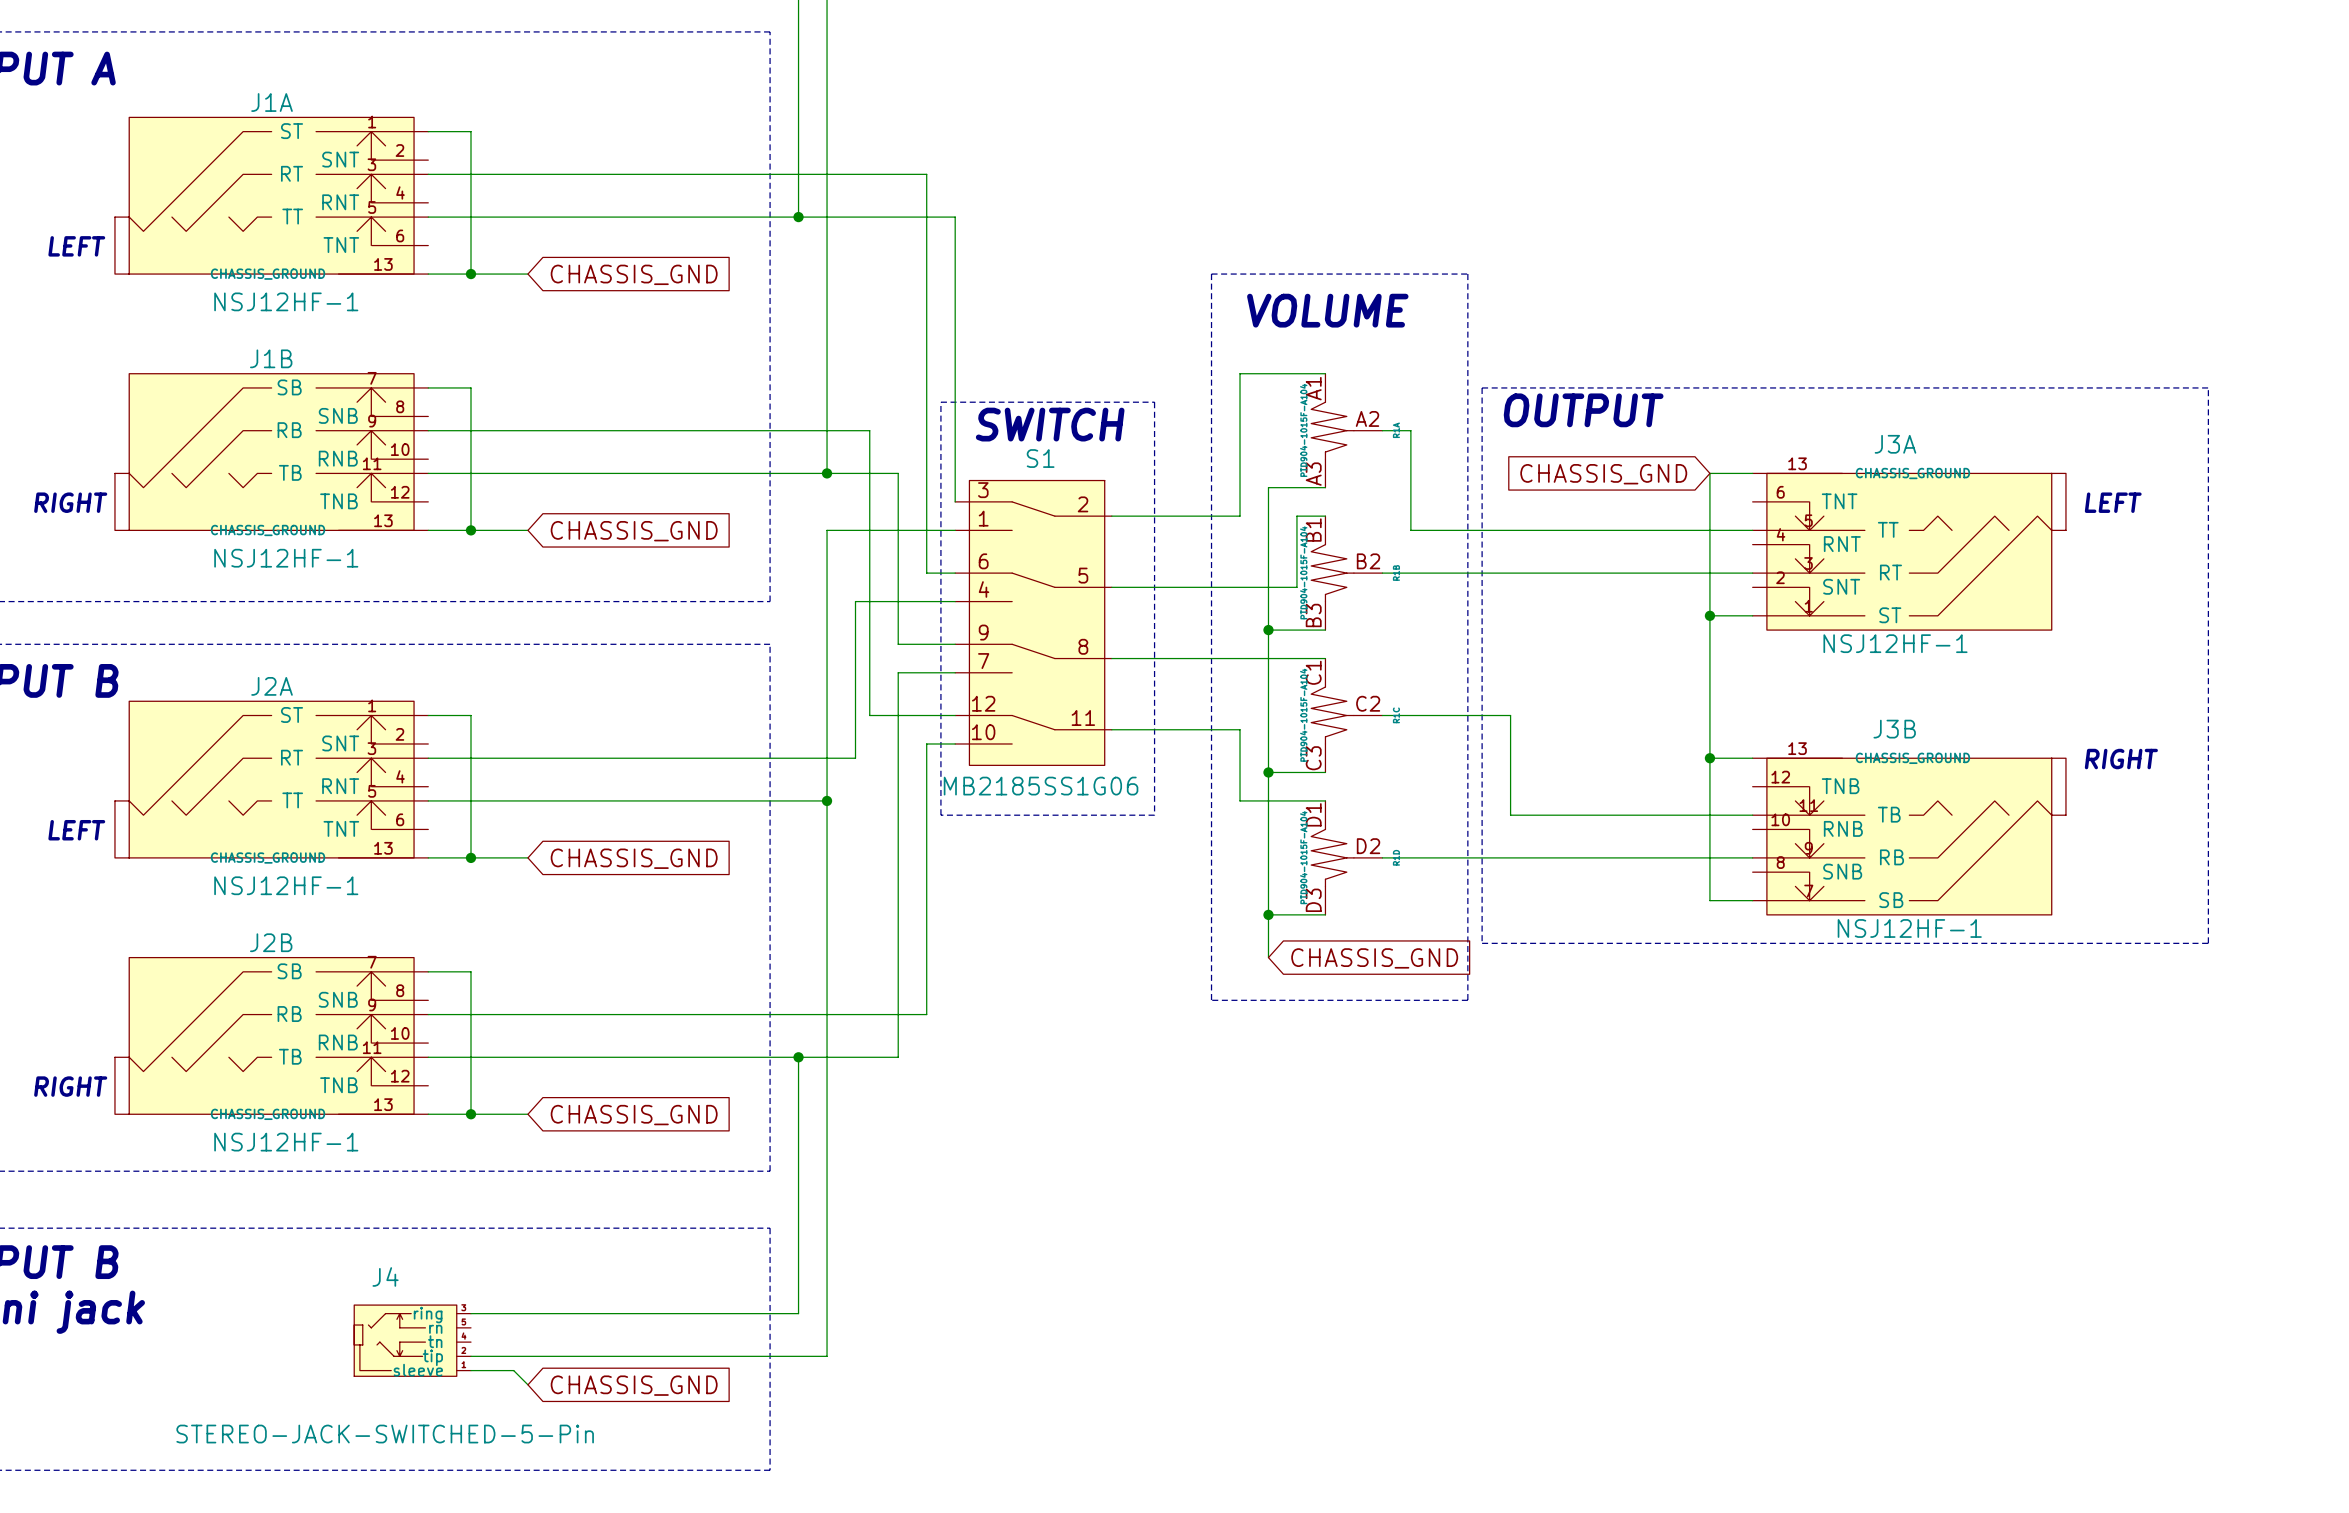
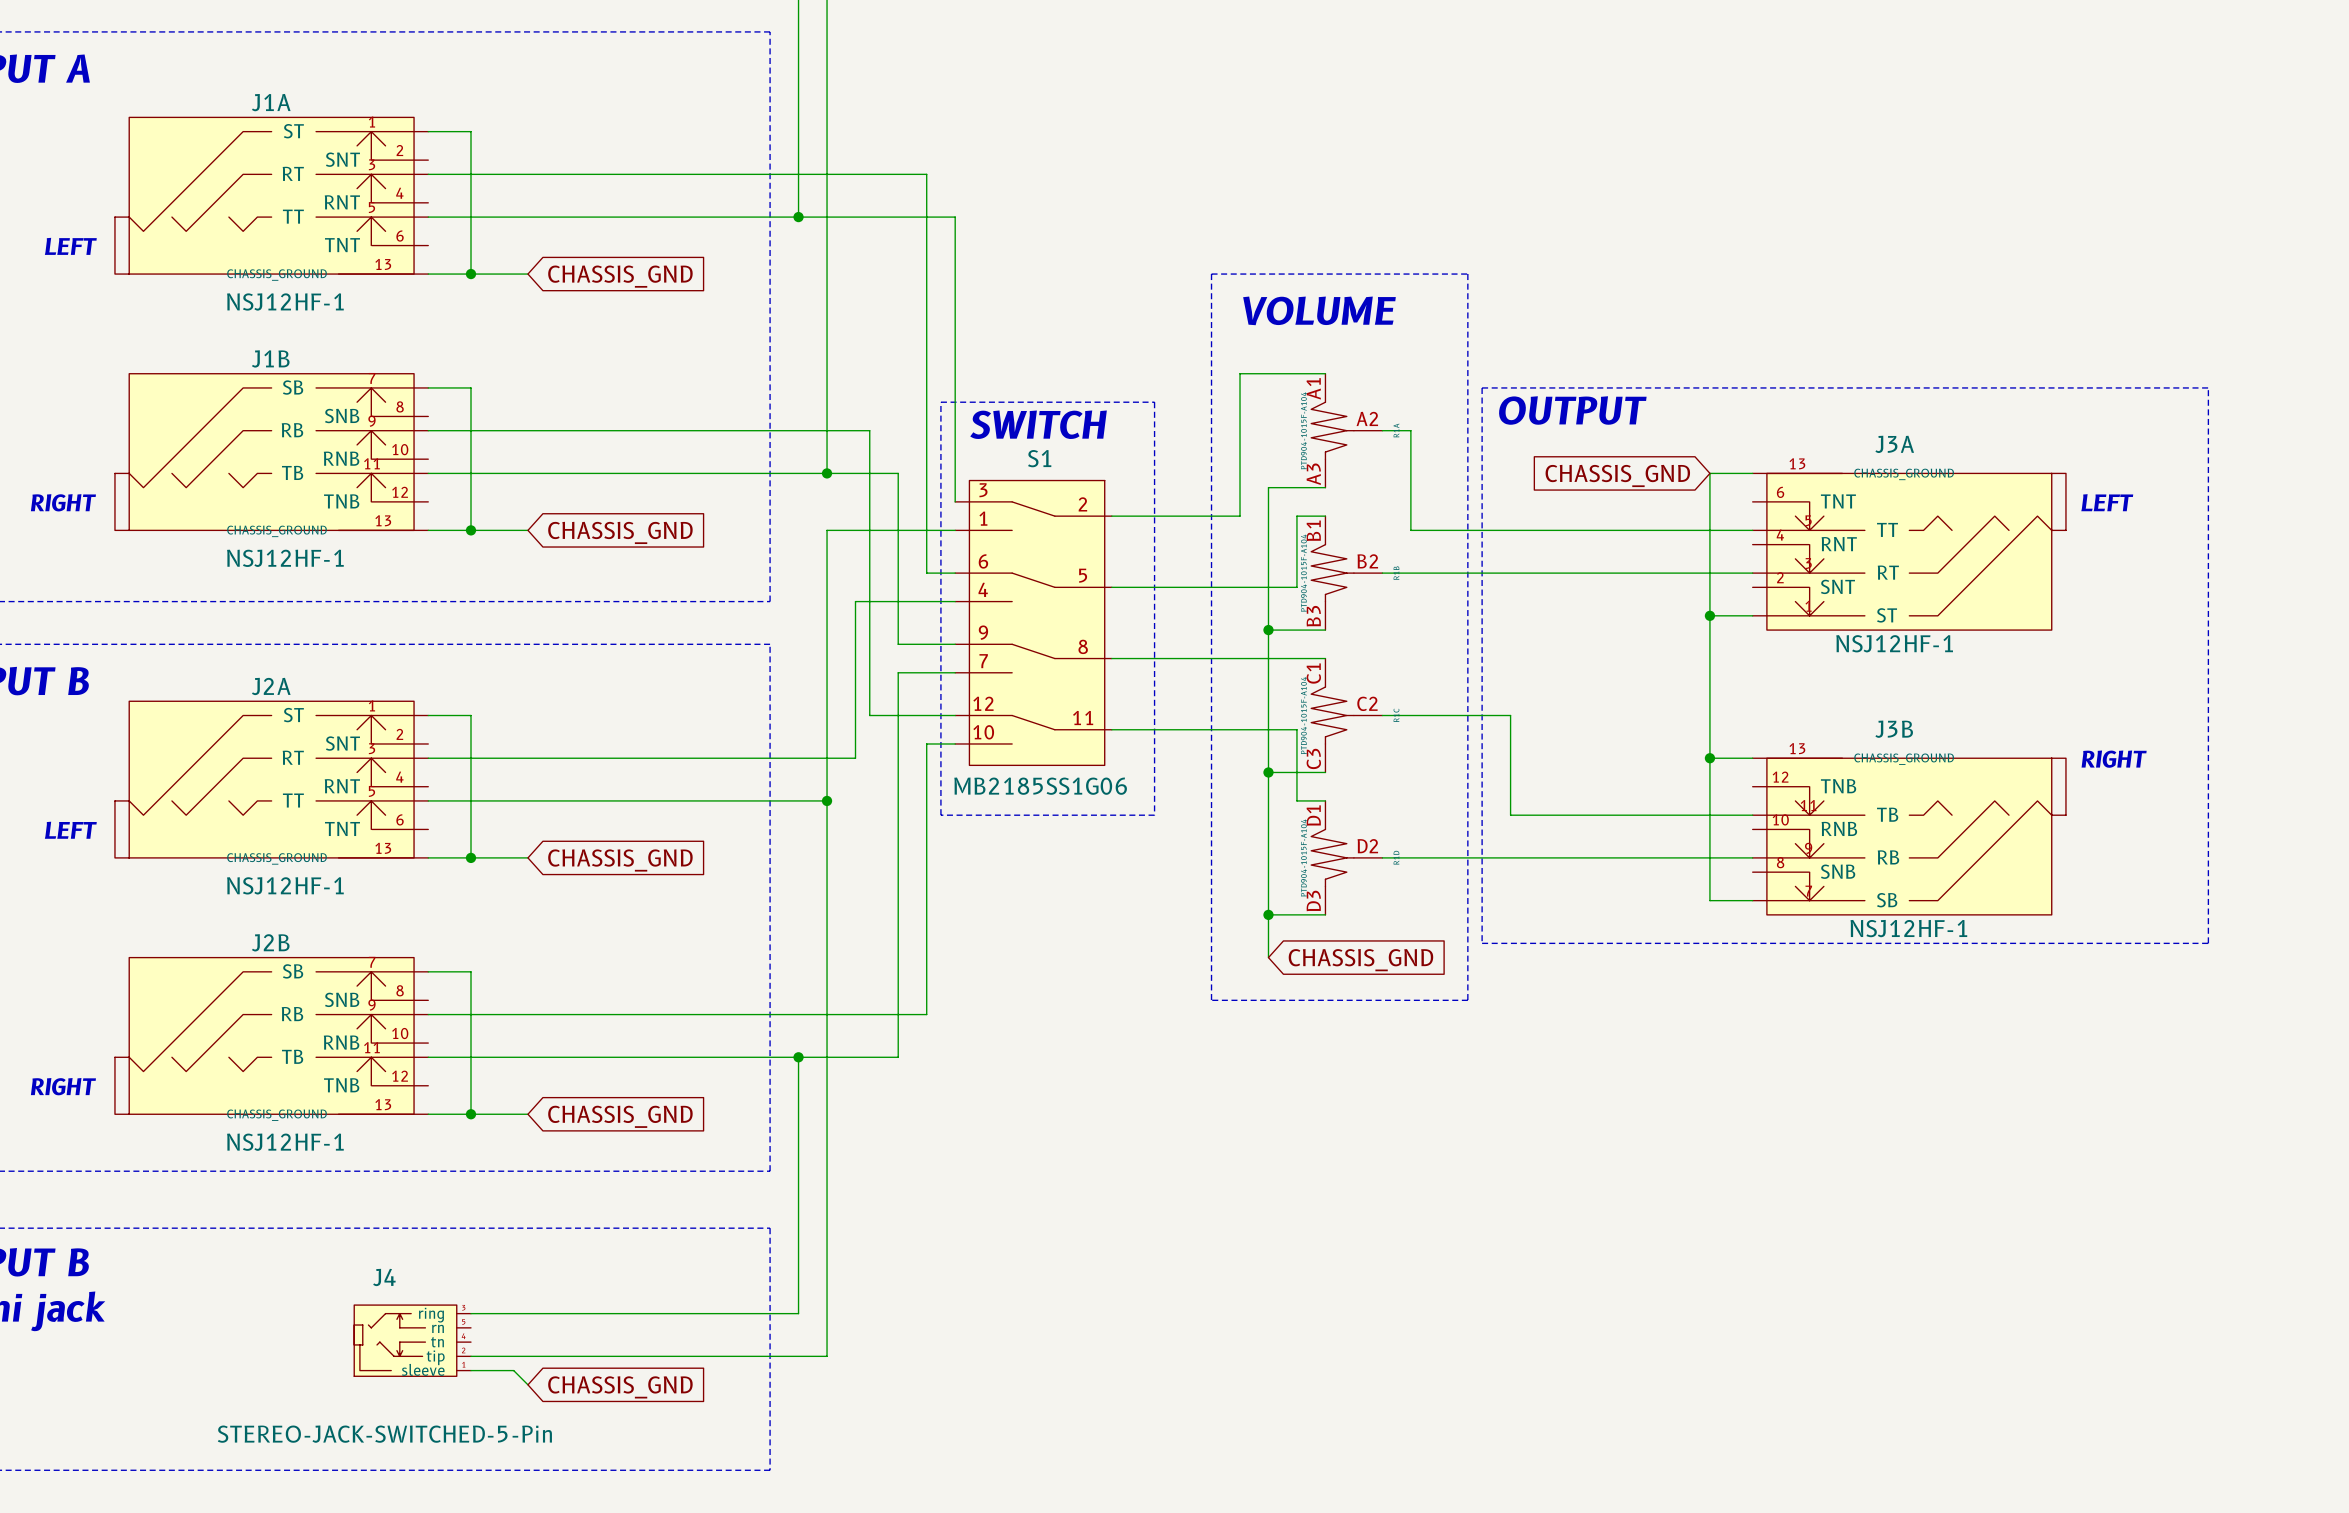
wire: (1240, 729) (1240, 800) (1296, 800) -> (1240, 729) (1296, 729) (1296, 800)

